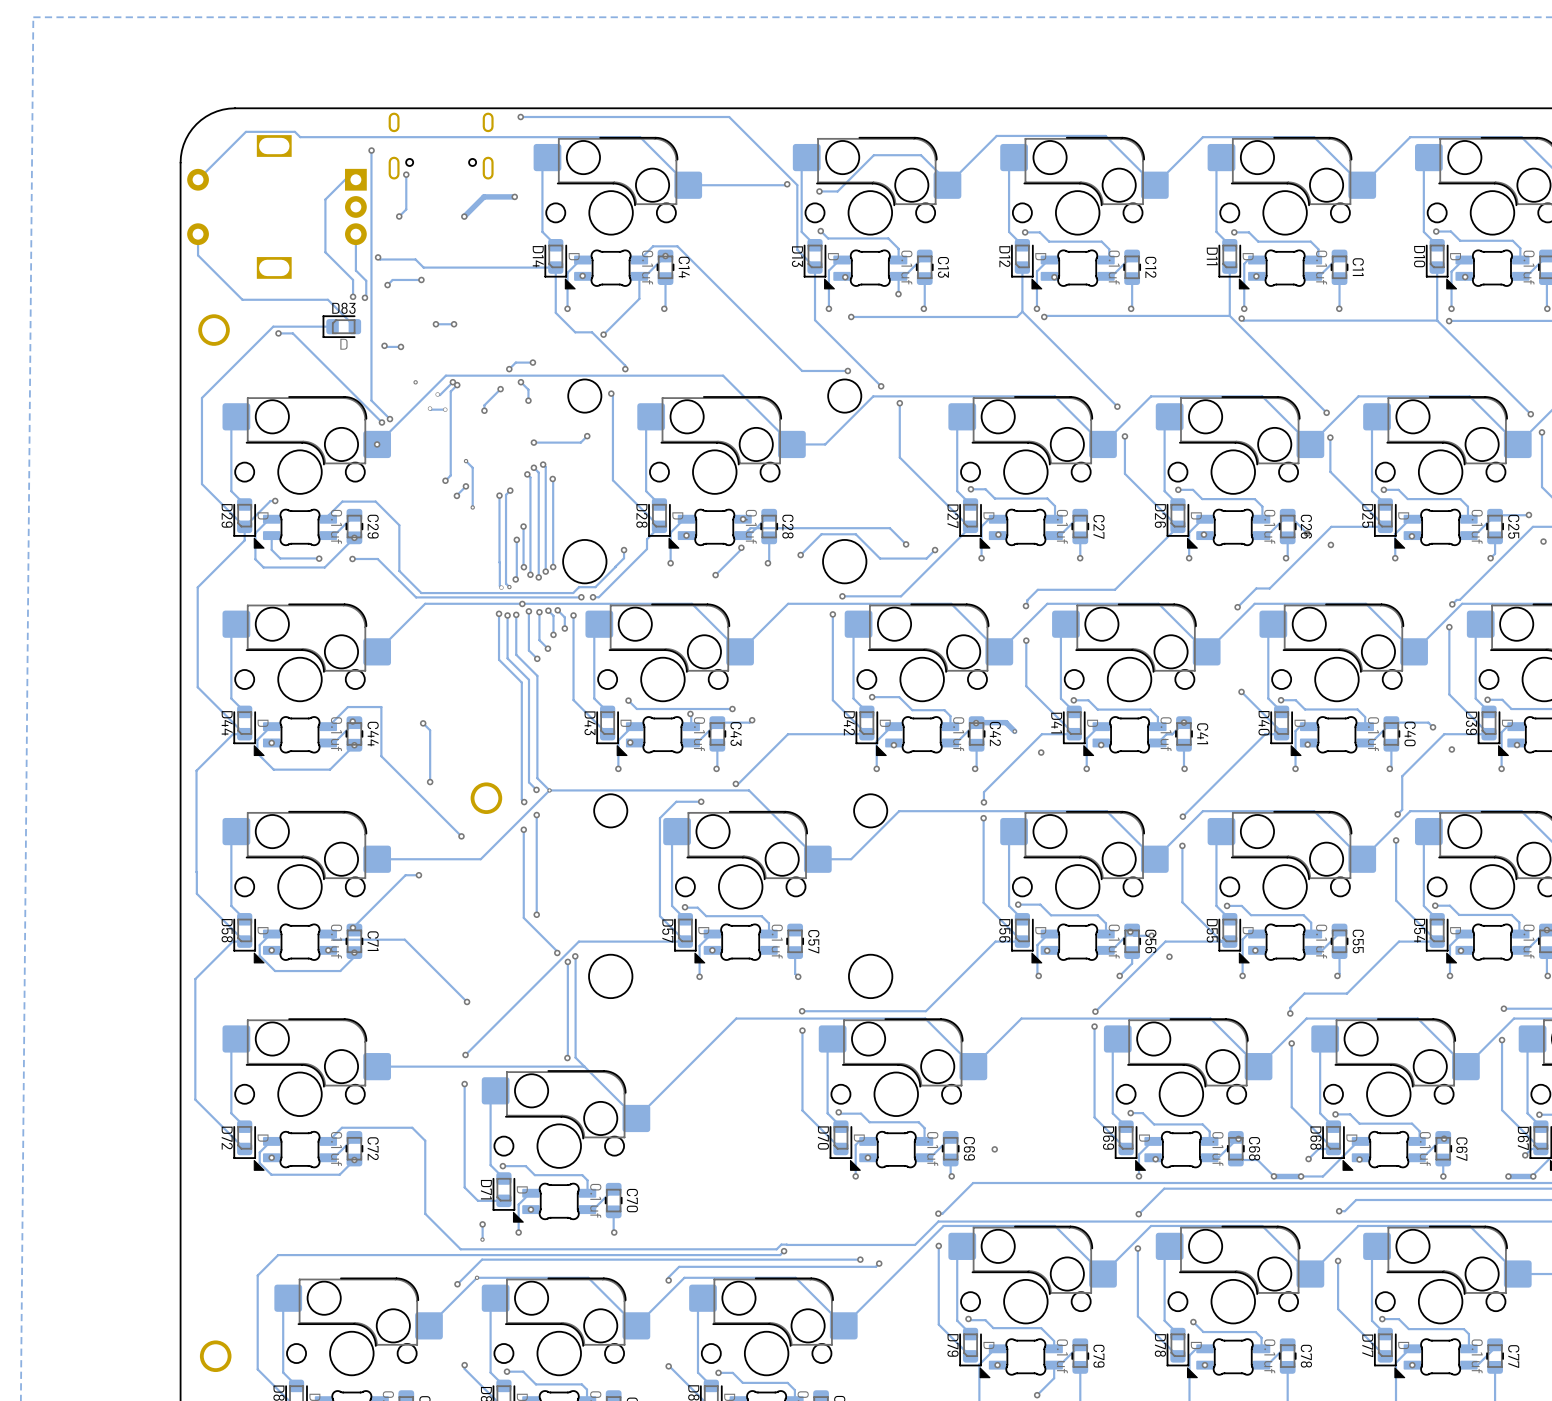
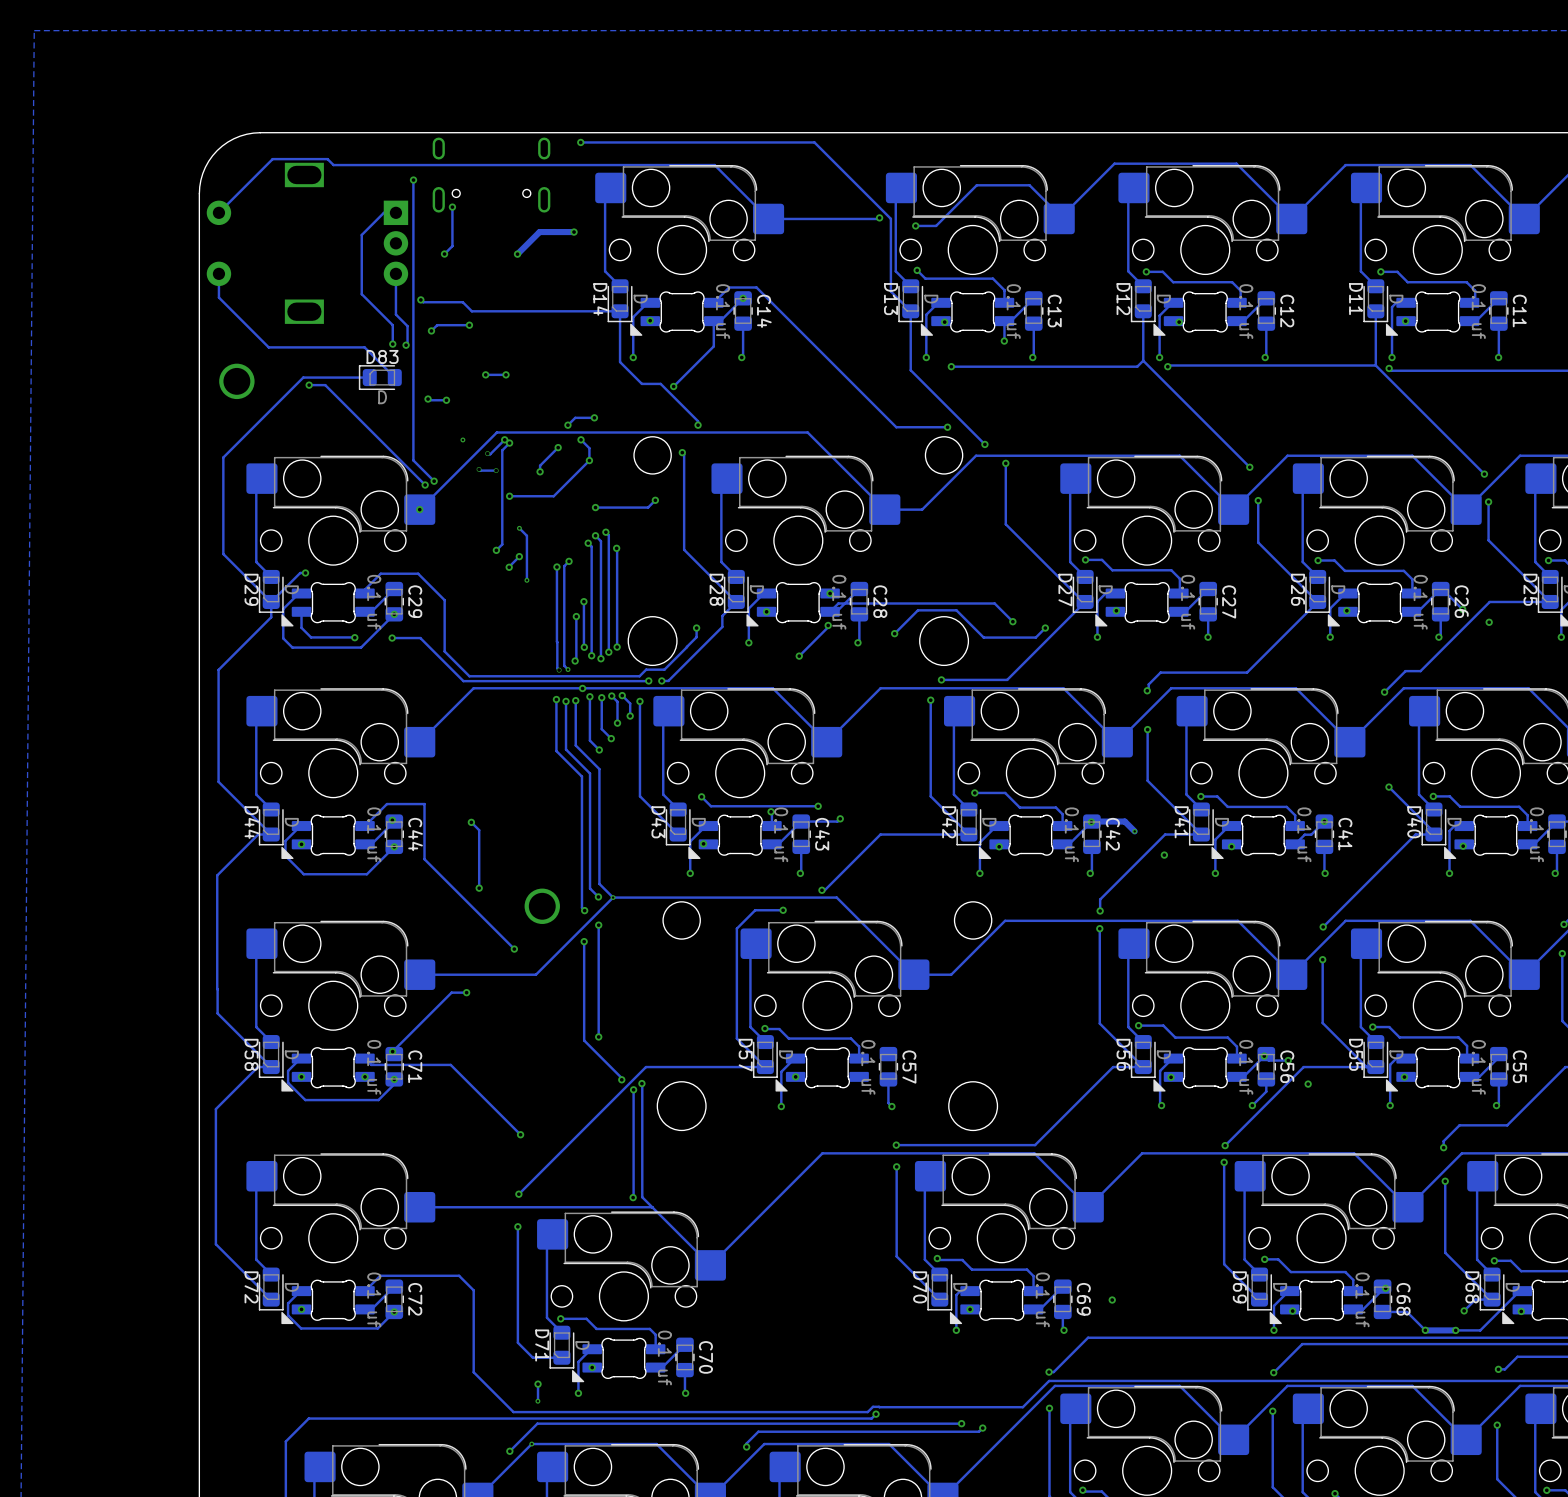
track: none -> (589, 460) (553, 496) (509, 496)
via: none -> (509, 496)

